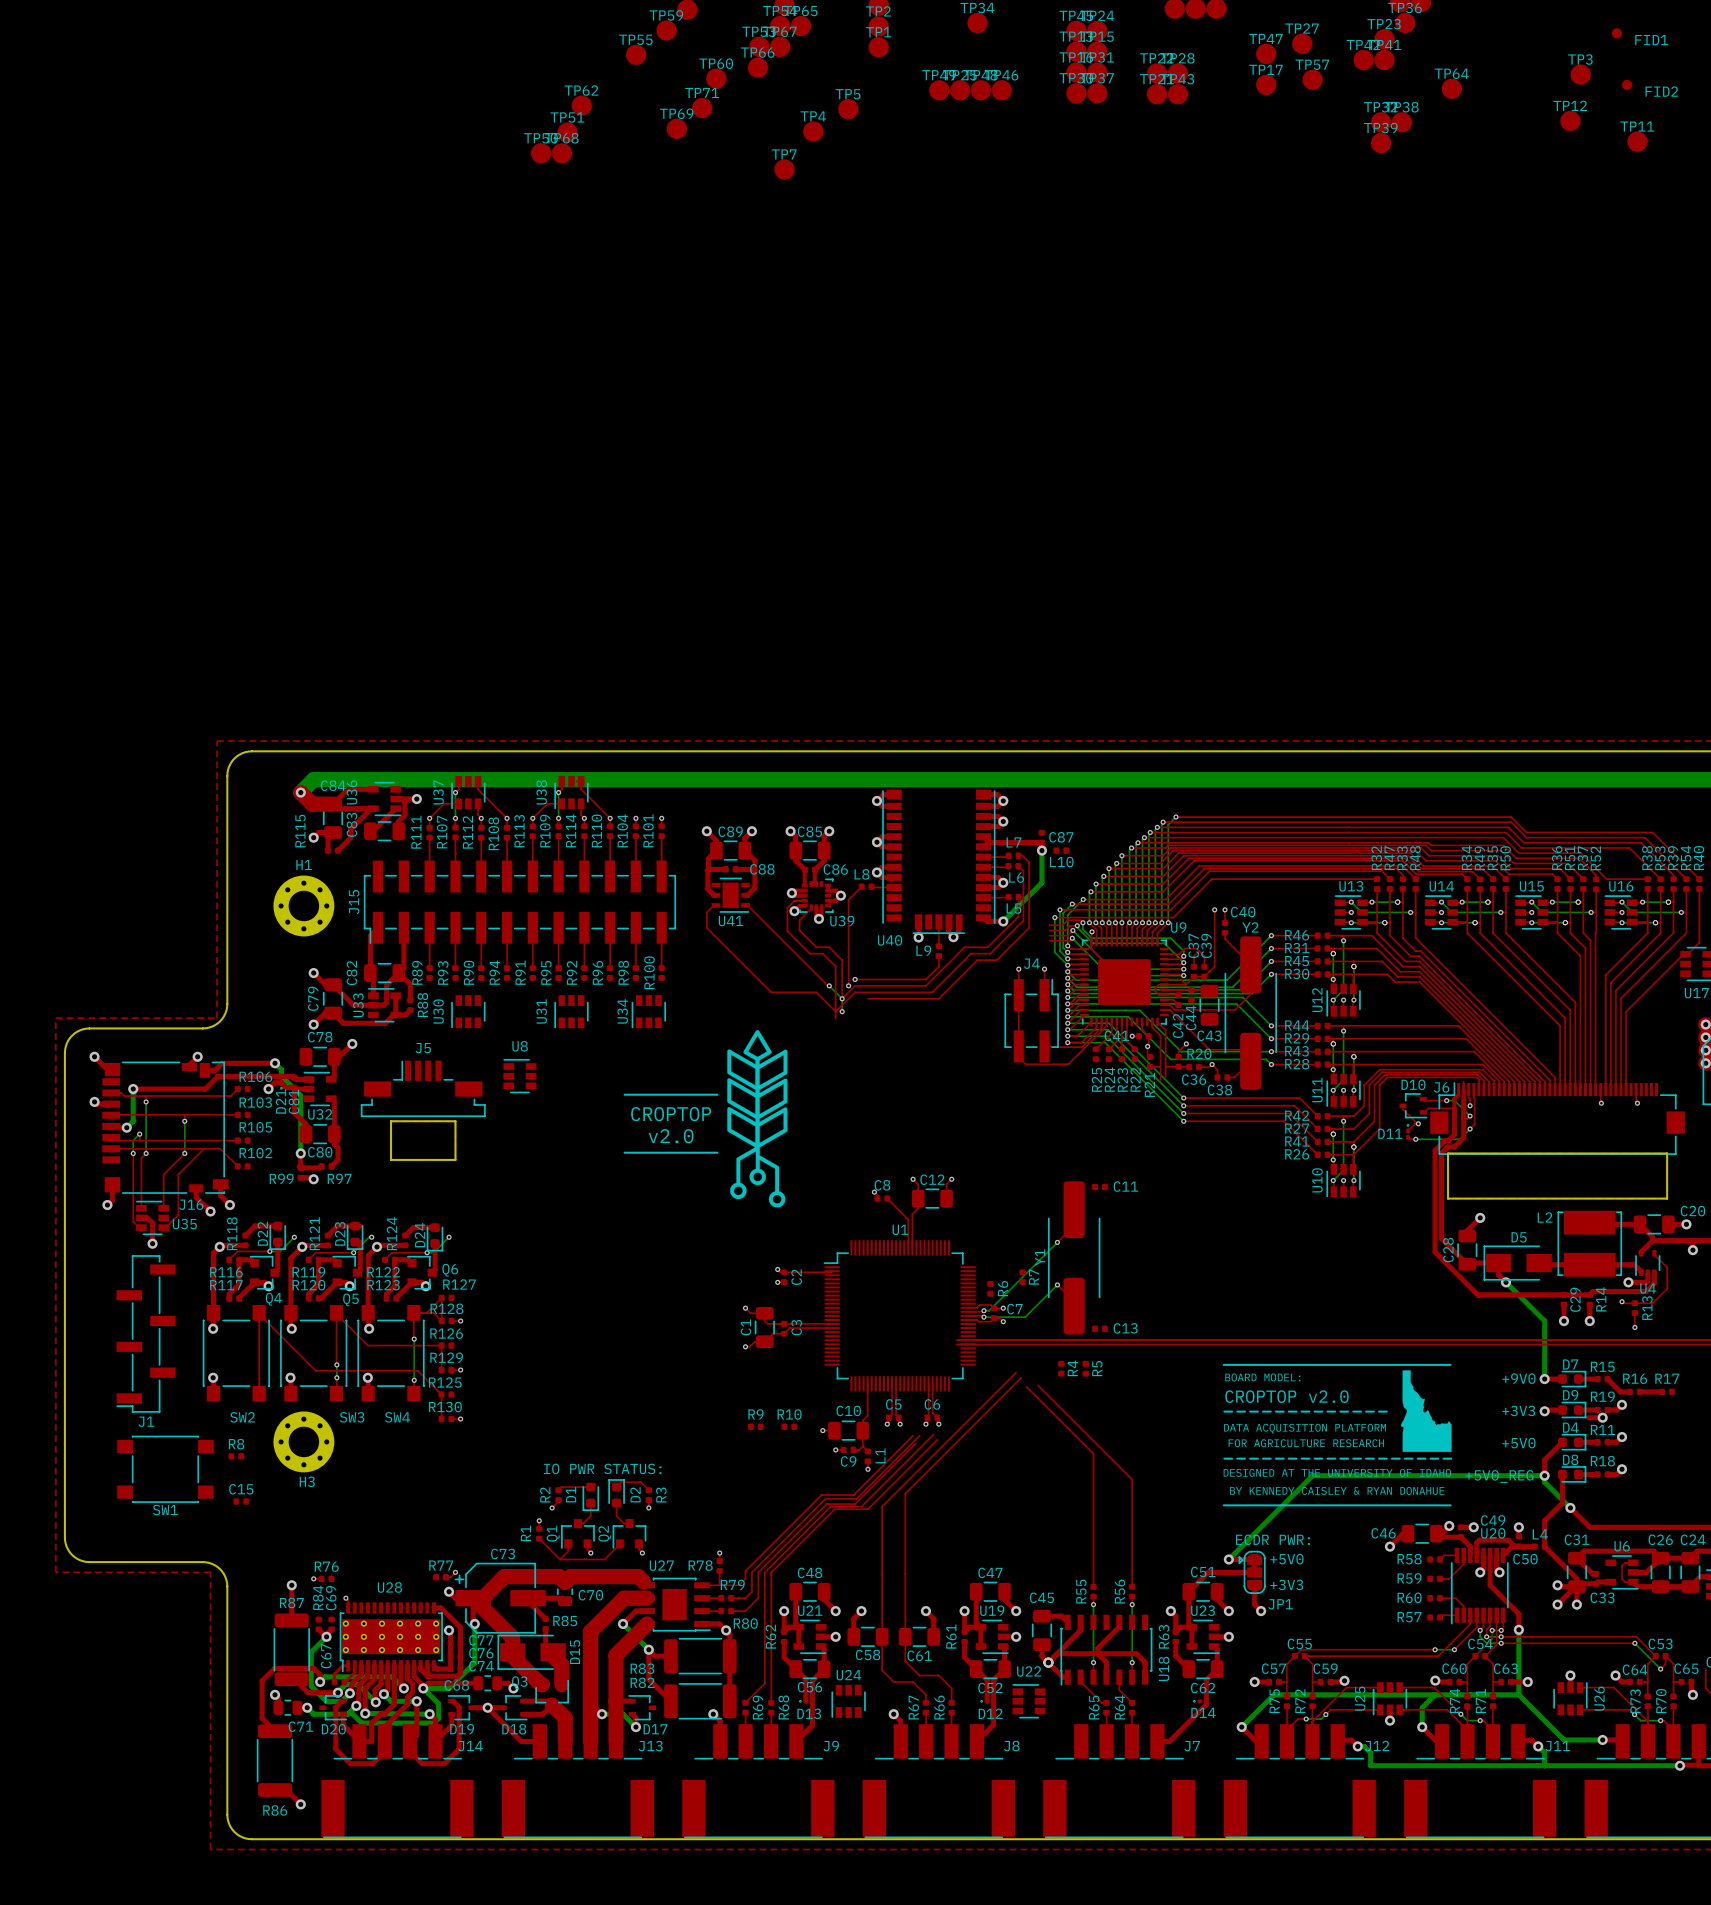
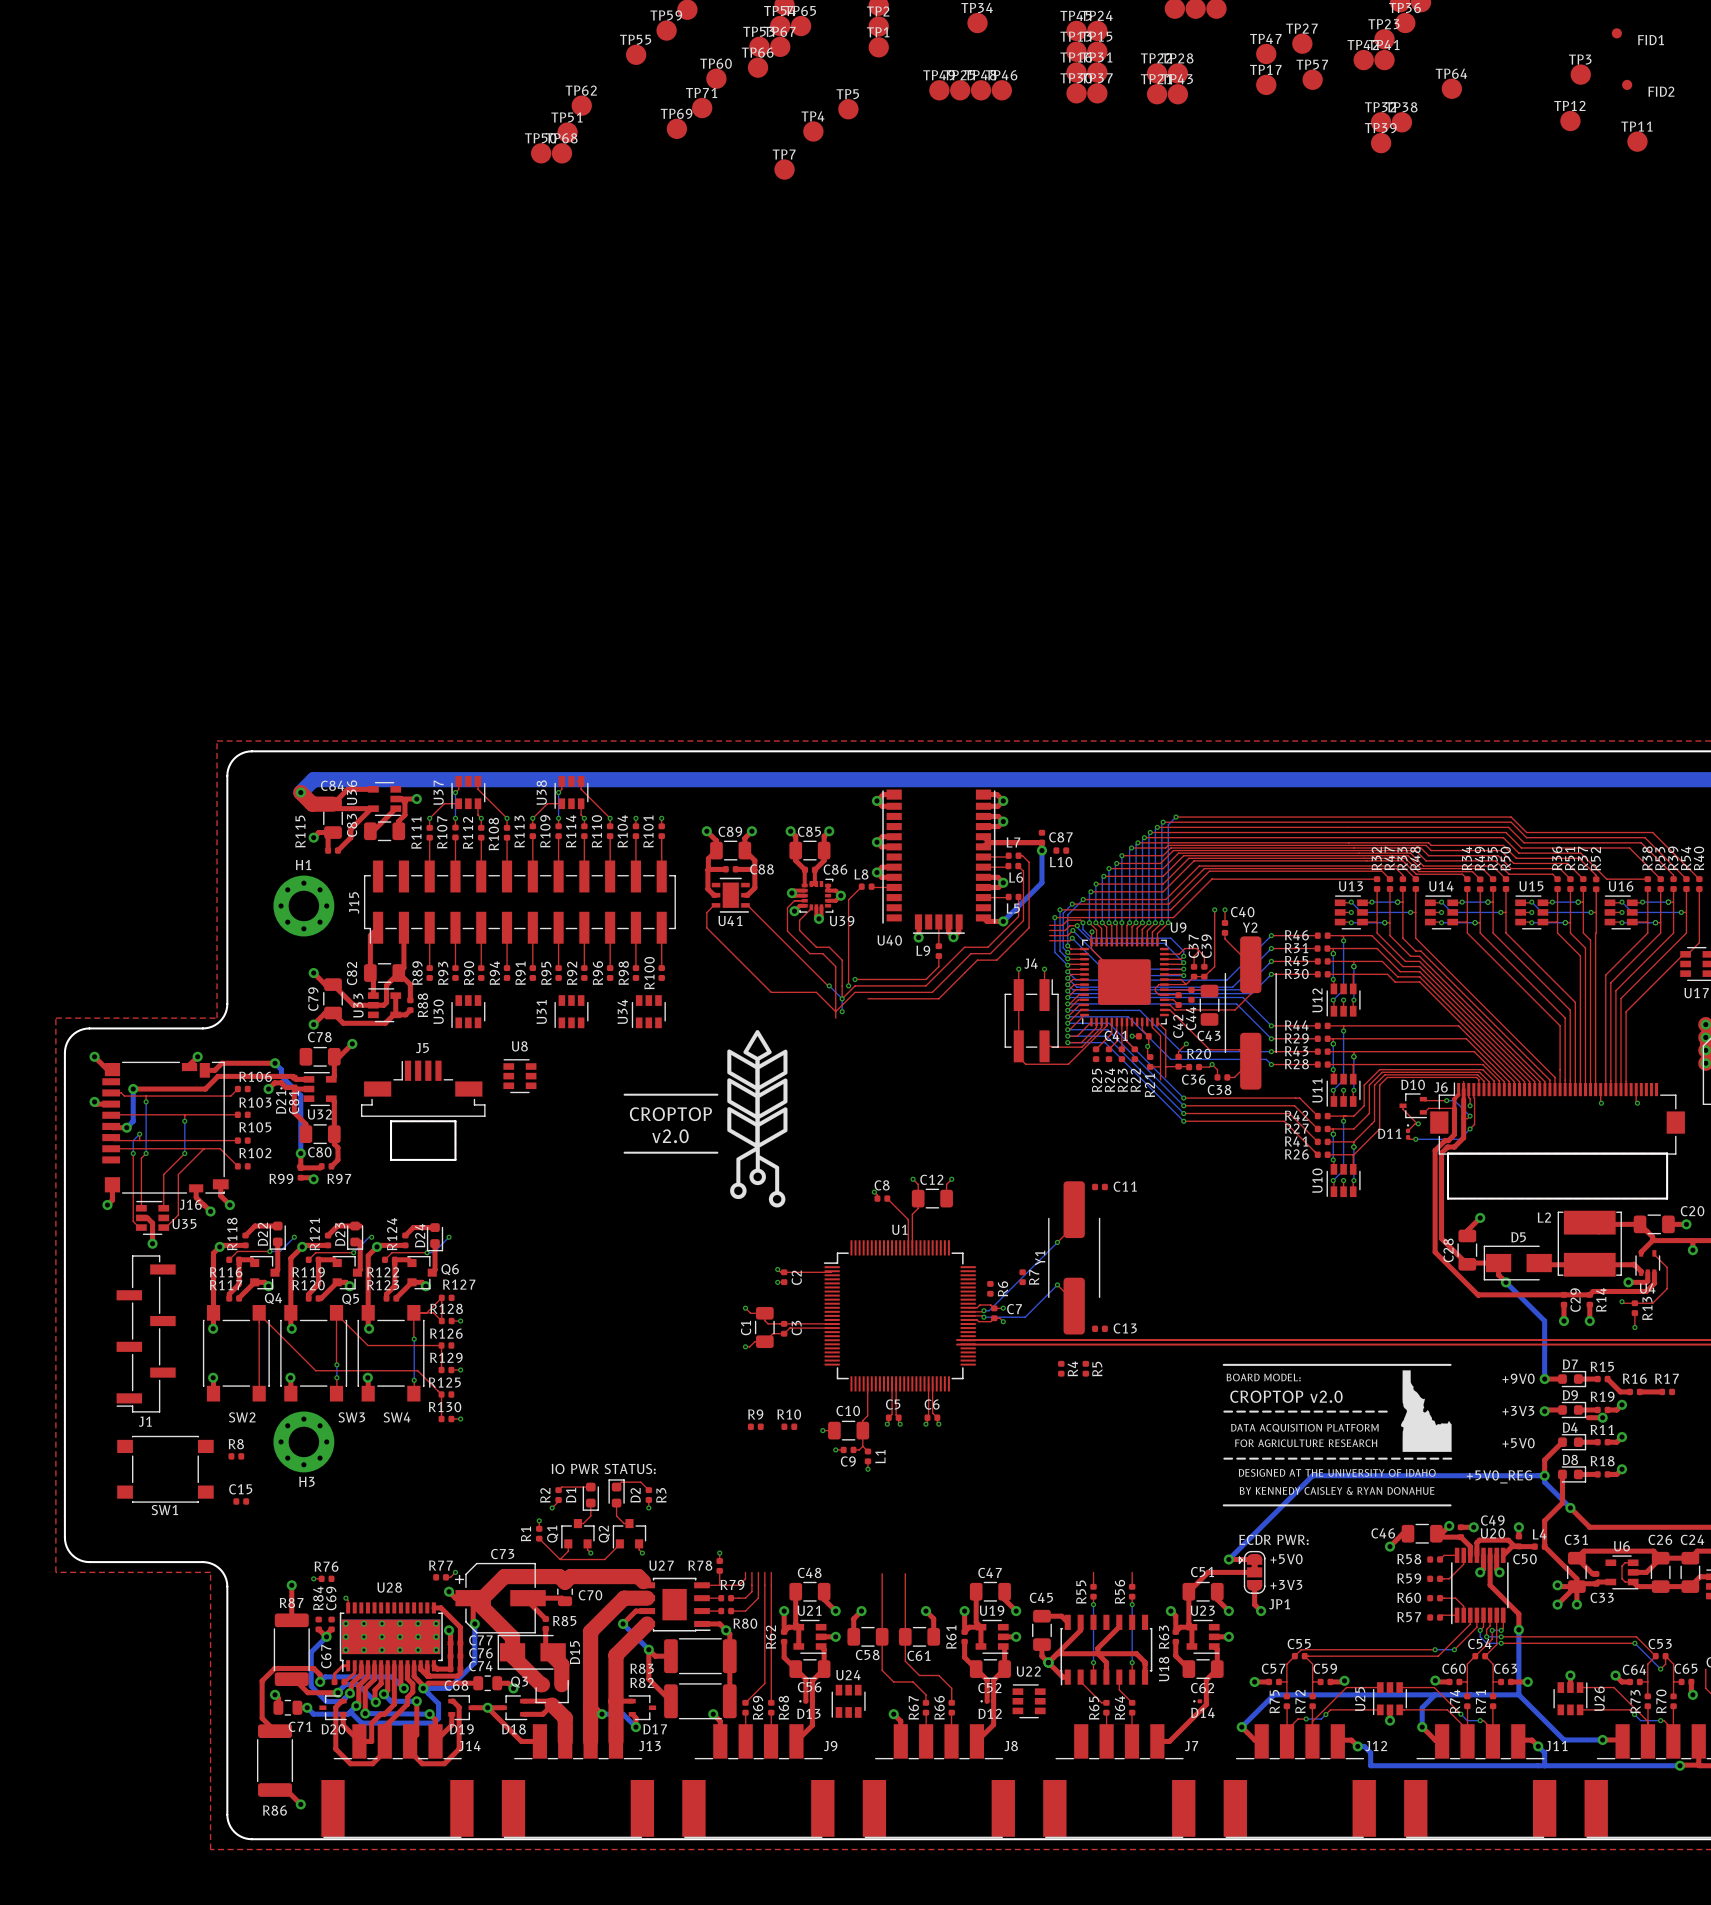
top track: (1016, 1372) (882, 1506) (882, 1573) -> none
top track: (1021, 1377) (905, 1493) (905, 1573) -> none
top track: (1038, 1385) (1132, 1479) (1132, 1572) -> none
top track: (1026, 1386) (1093, 1453) (1093, 1572) -> none
top track: (933, 1434) (861, 1506) (830, 1506) (764, 1572) -> none
top track: (913, 1435) (853, 1495) (821, 1495) (745, 1572) -> none
top track: (919, 1435) (856, 1498) (825, 1498) (751, 1572) -> none
top track: (937, 1439) (867, 1509) (834, 1509) (771, 1572) -> none
top track: (915, 1443) (855, 1504) (826, 1504) (758, 1572) -> none

